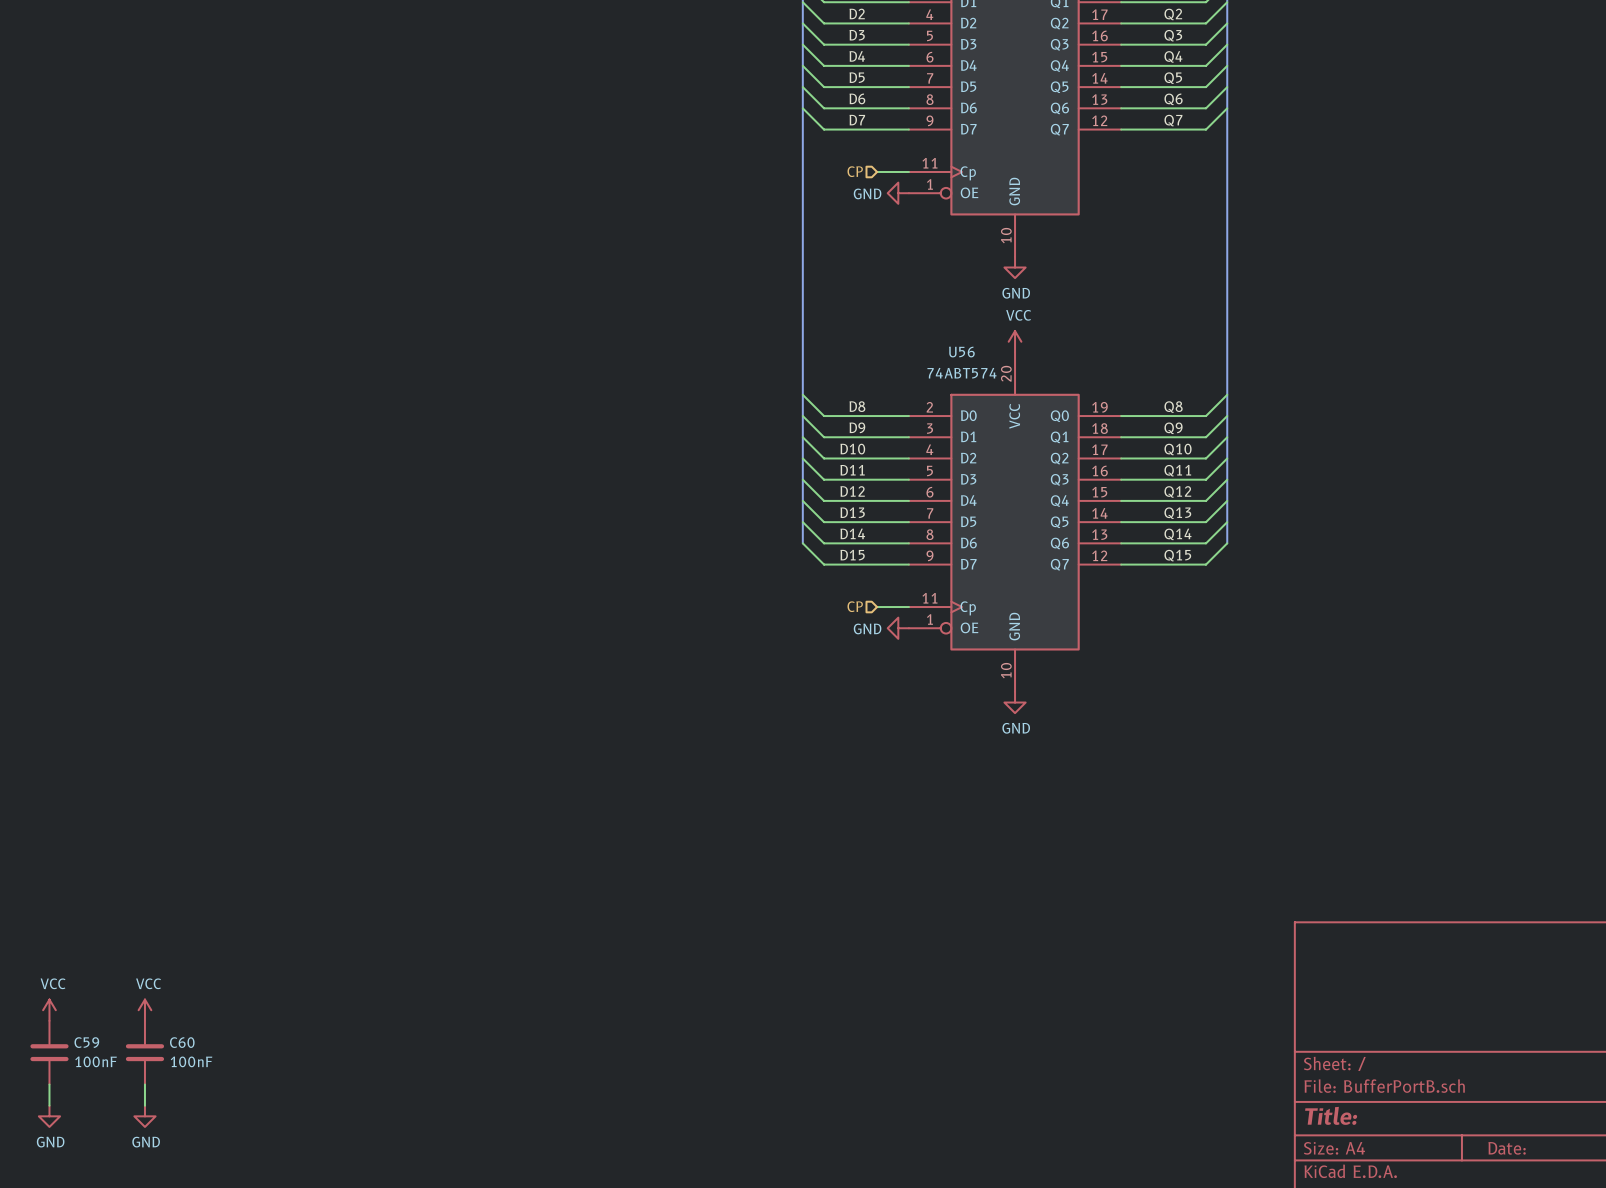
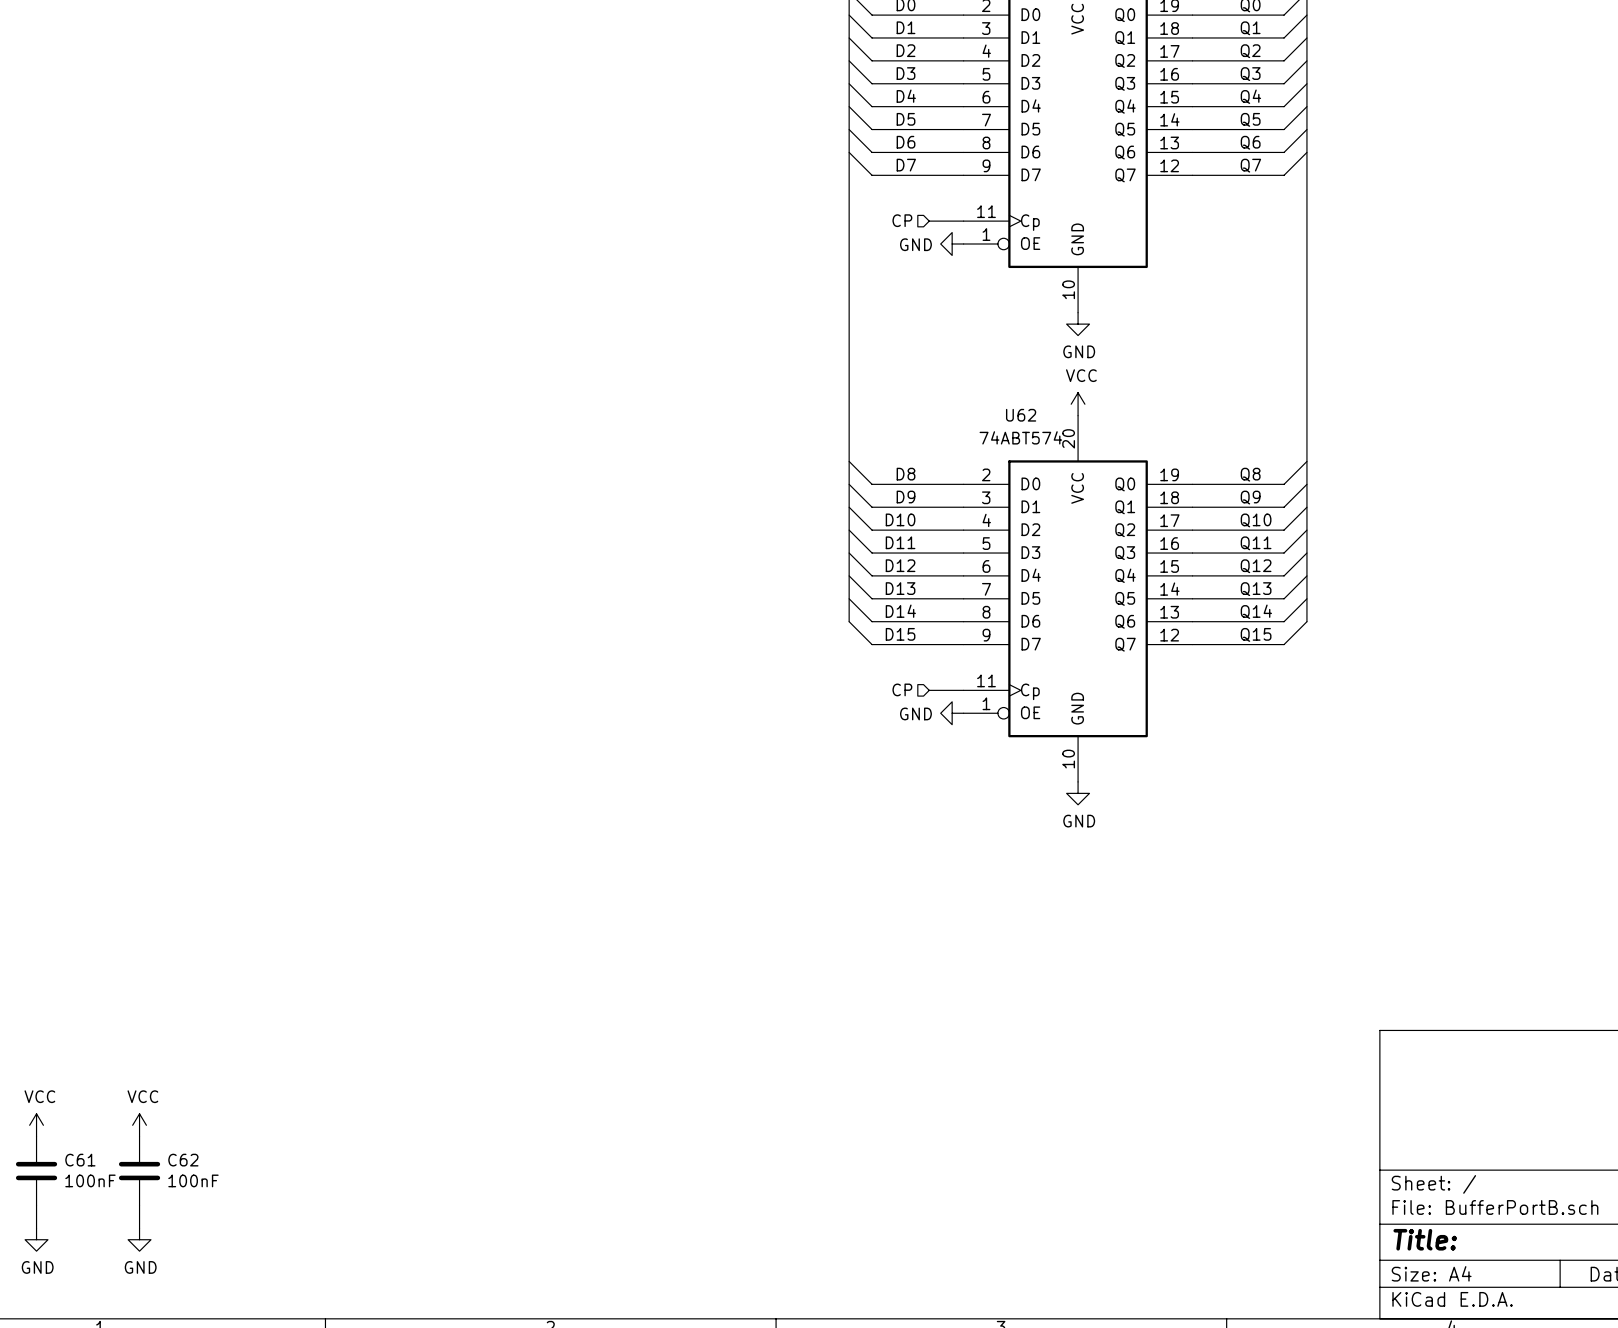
U56 name: U56 (961, 352) -> U62 (1021, 415)
C59 name: C59 (86, 1042) -> C61 (80, 1160)
C60 name: C60 (182, 1042) -> C62 (183, 1160)

